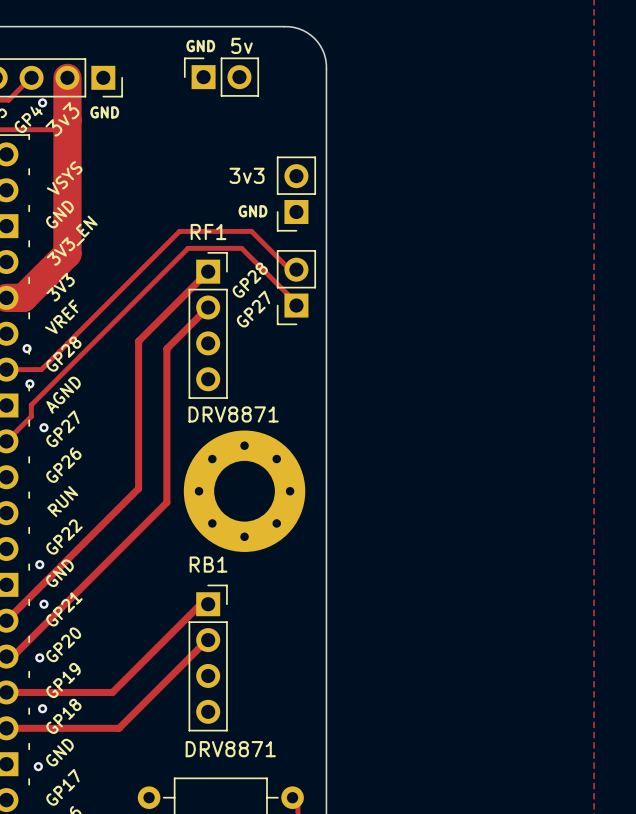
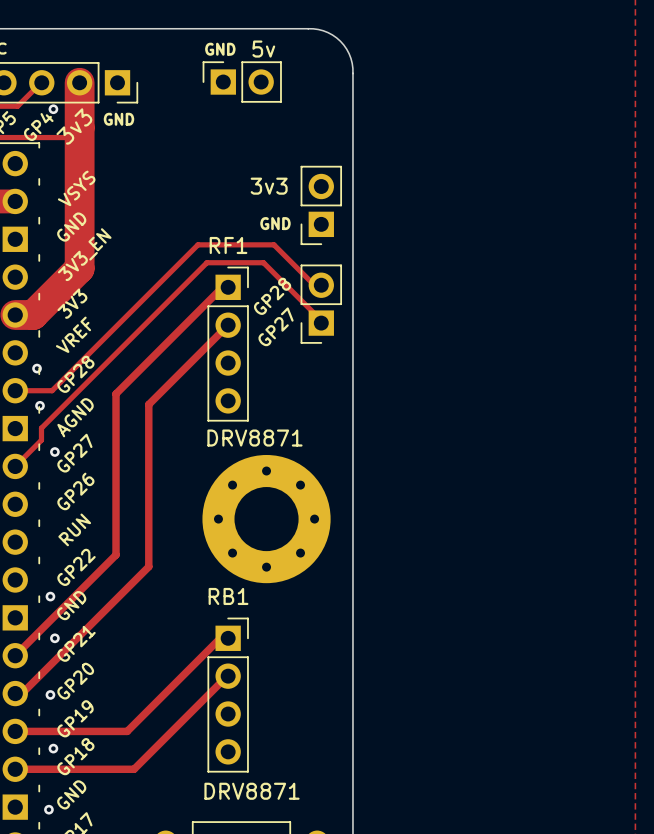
track: (208, 271) (138, 341) (138, 488) (101, 525) -> (228, 287) (222, 287) (116, 393) (116, 554)
track: (166, 348) (166, 502) (132, 536) -> (184, 368) (148, 404) (148, 566)

